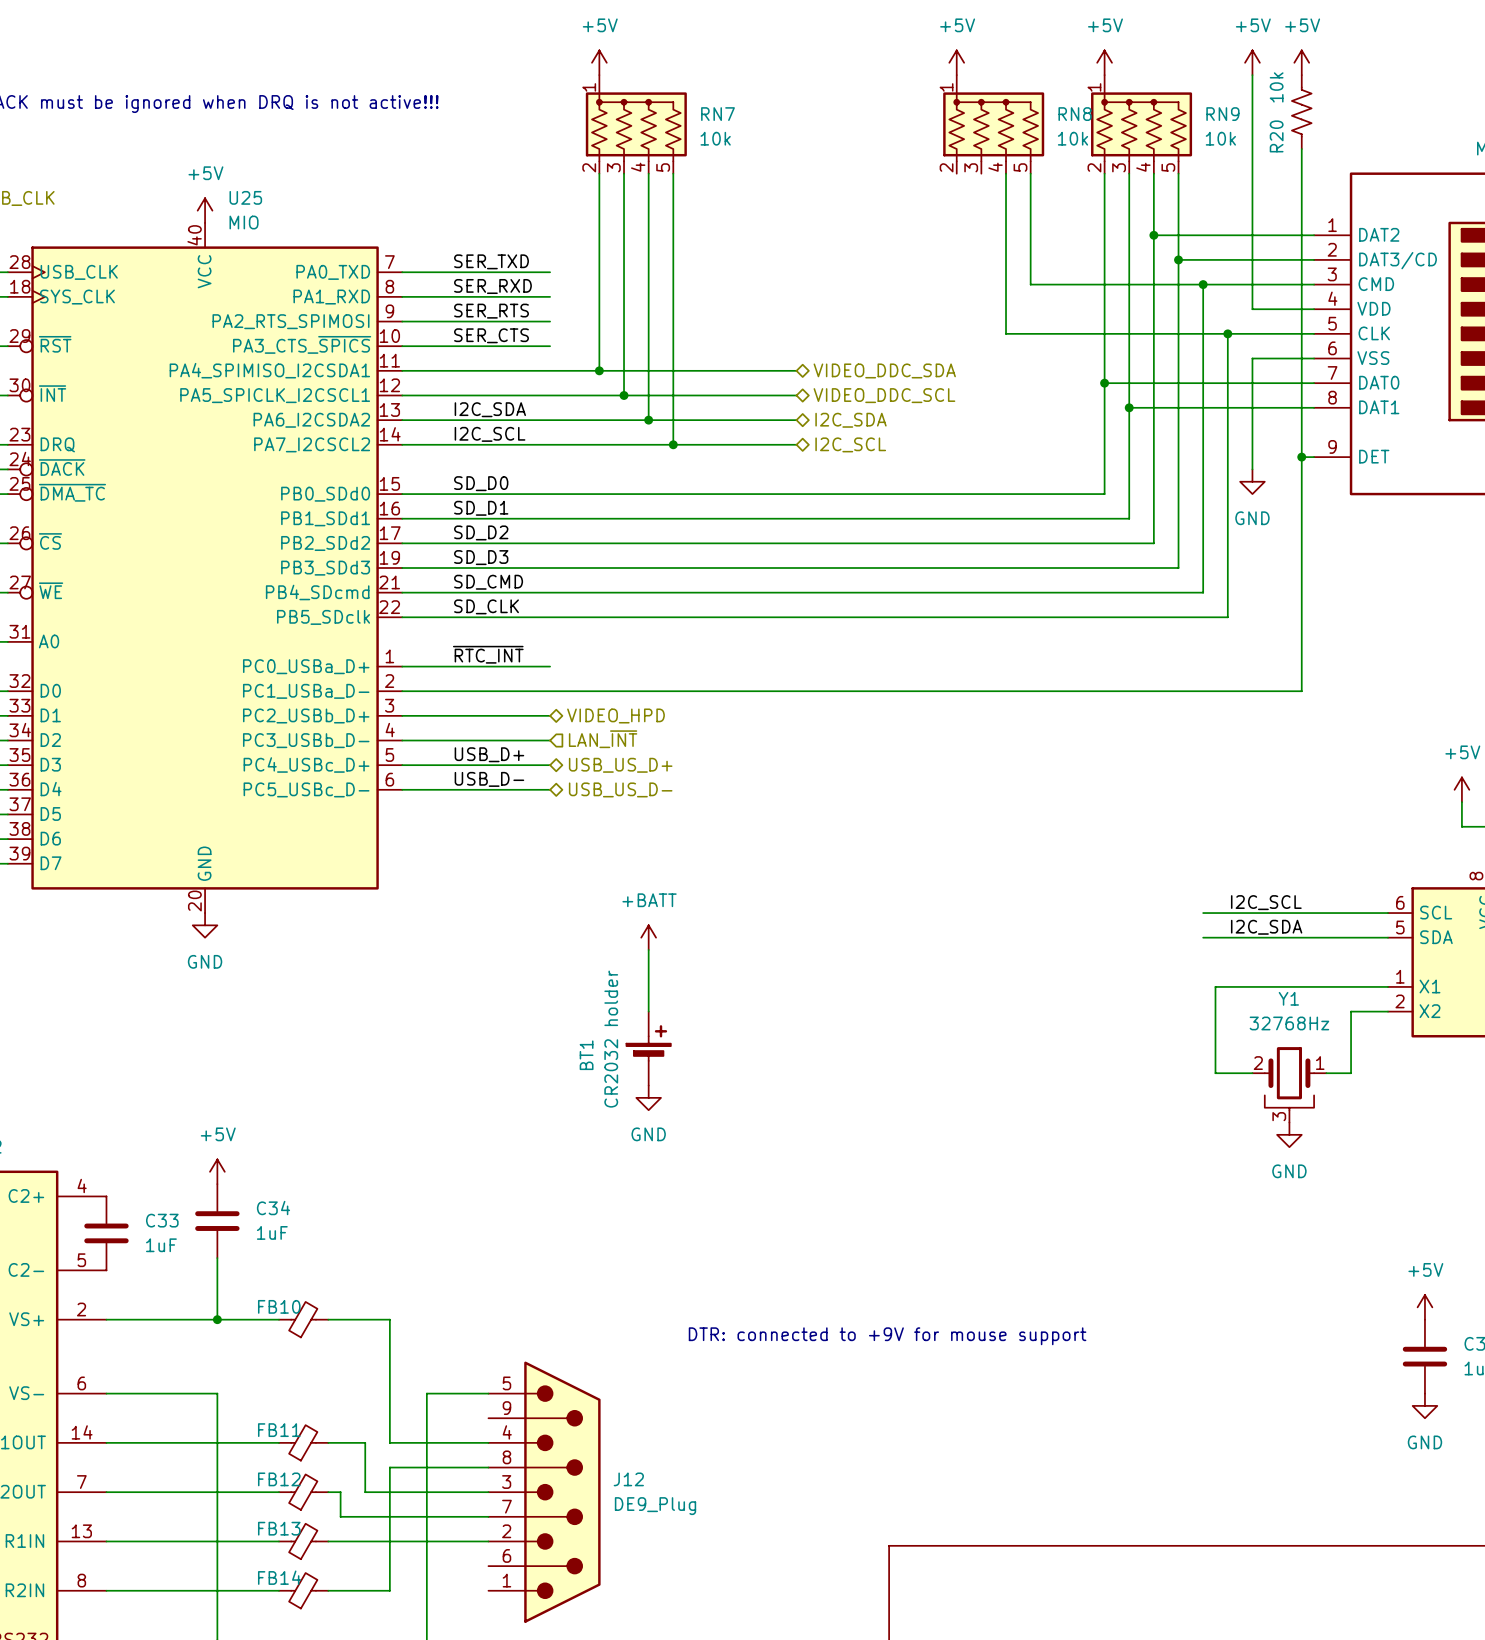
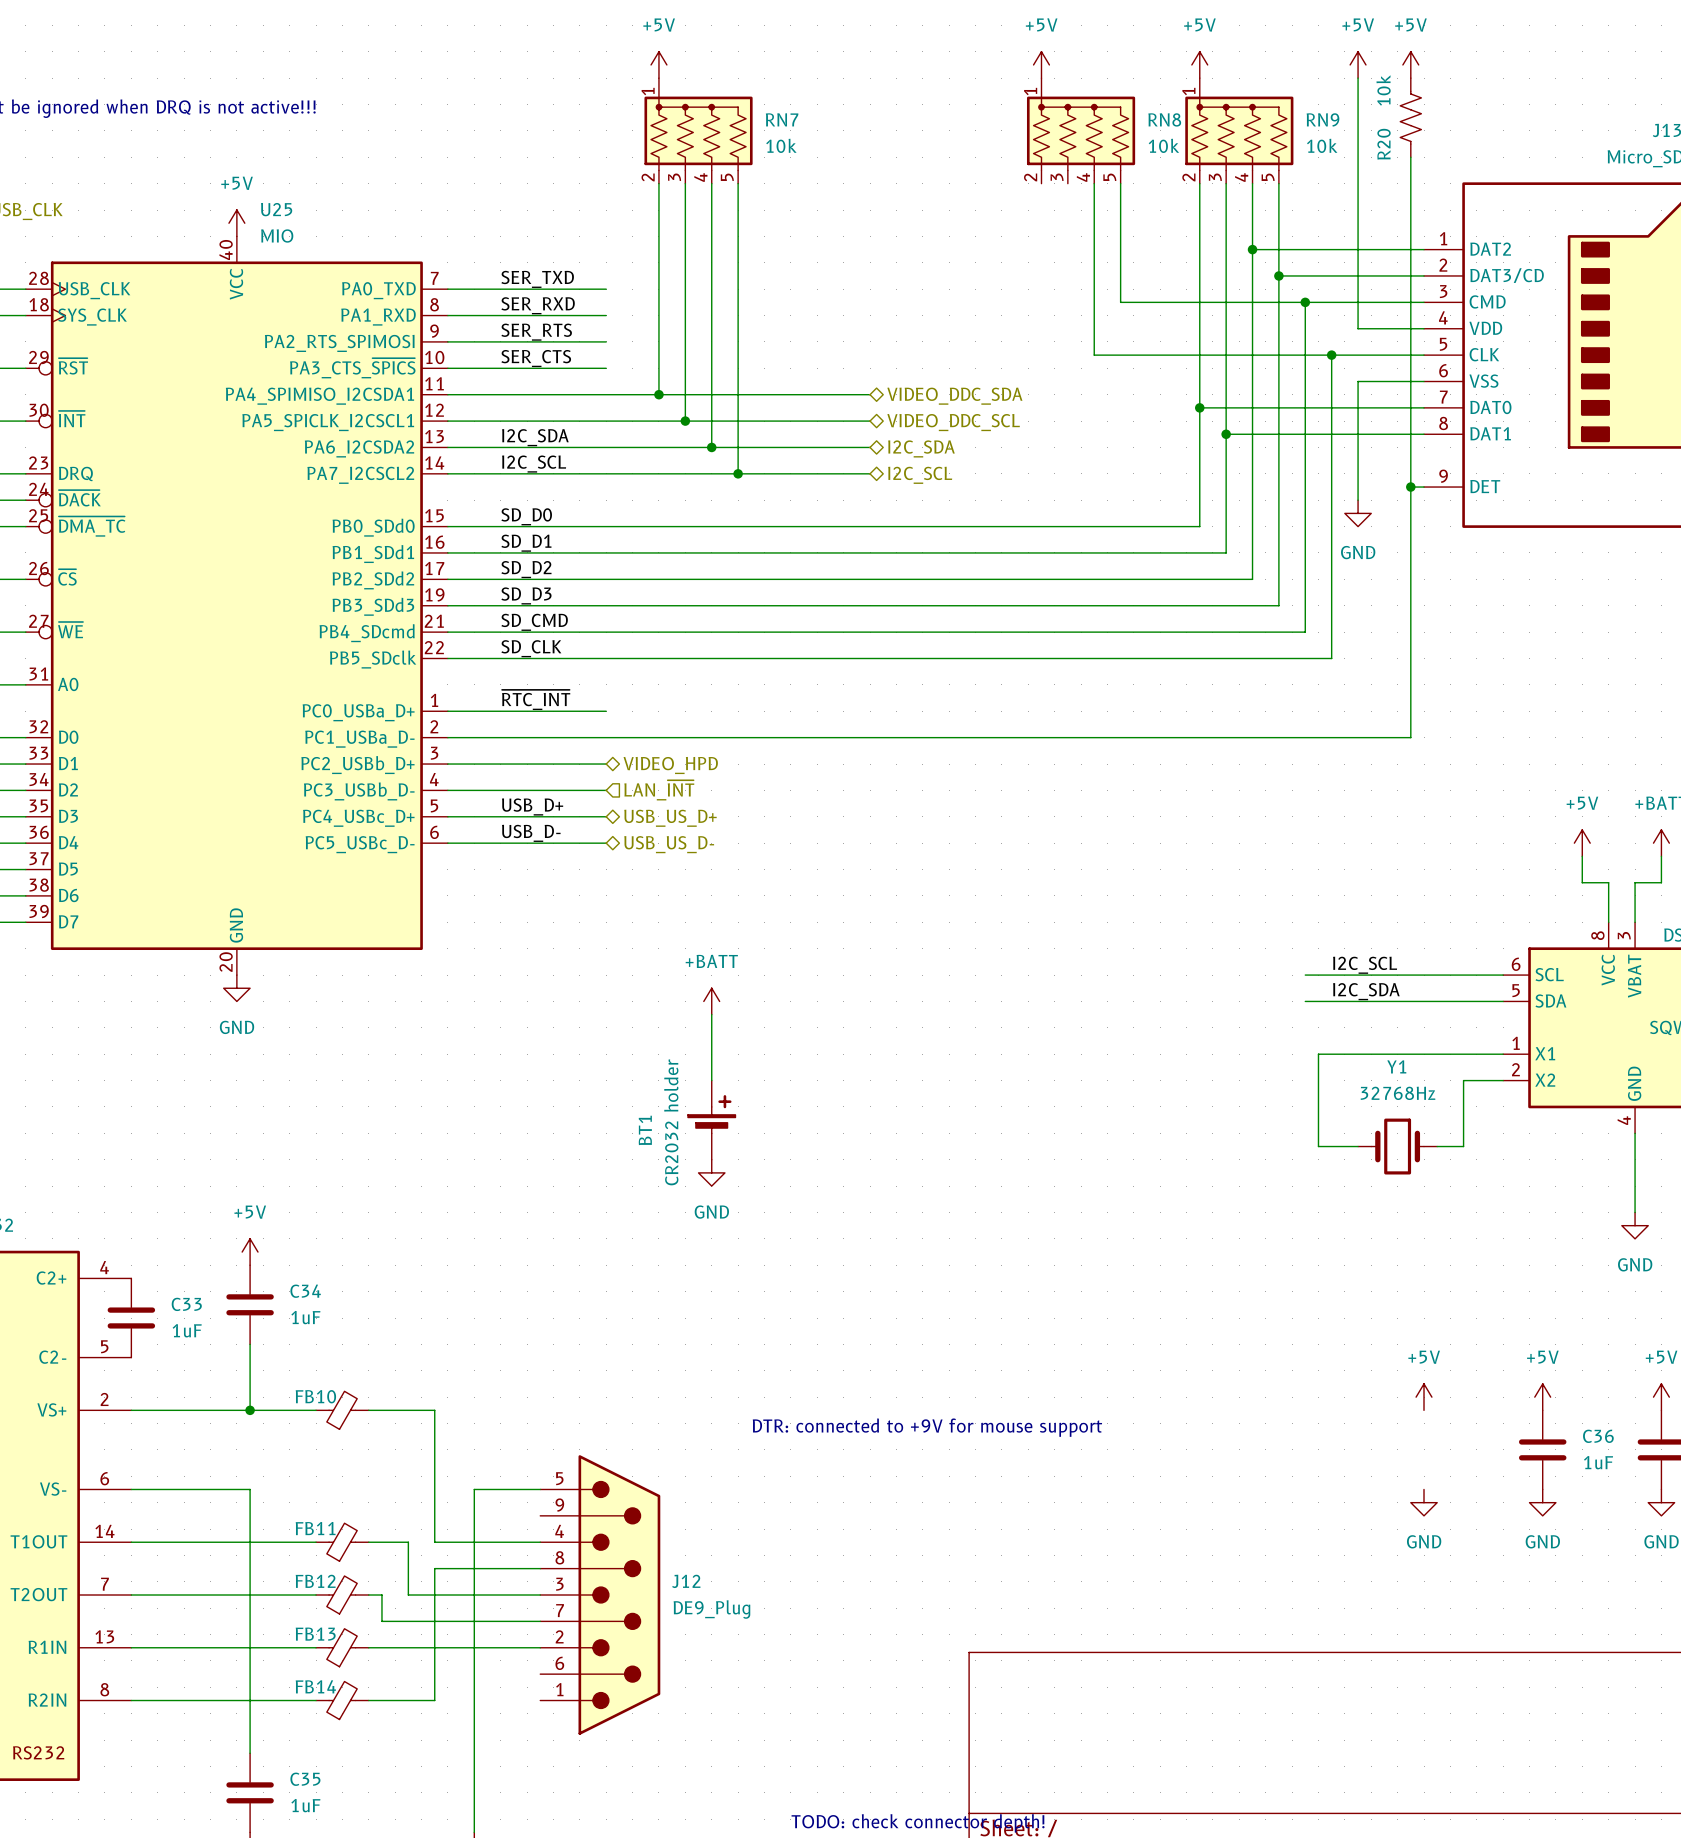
Y1 symbol: [1252, 1047, 1327, 1123] -> [1358, 1118, 1438, 1175]
power symbol: GND (1289, 1134) -> none
power symbol: none -> +5V (1424, 1397)
power symbol: none -> GND (1424, 1502)

